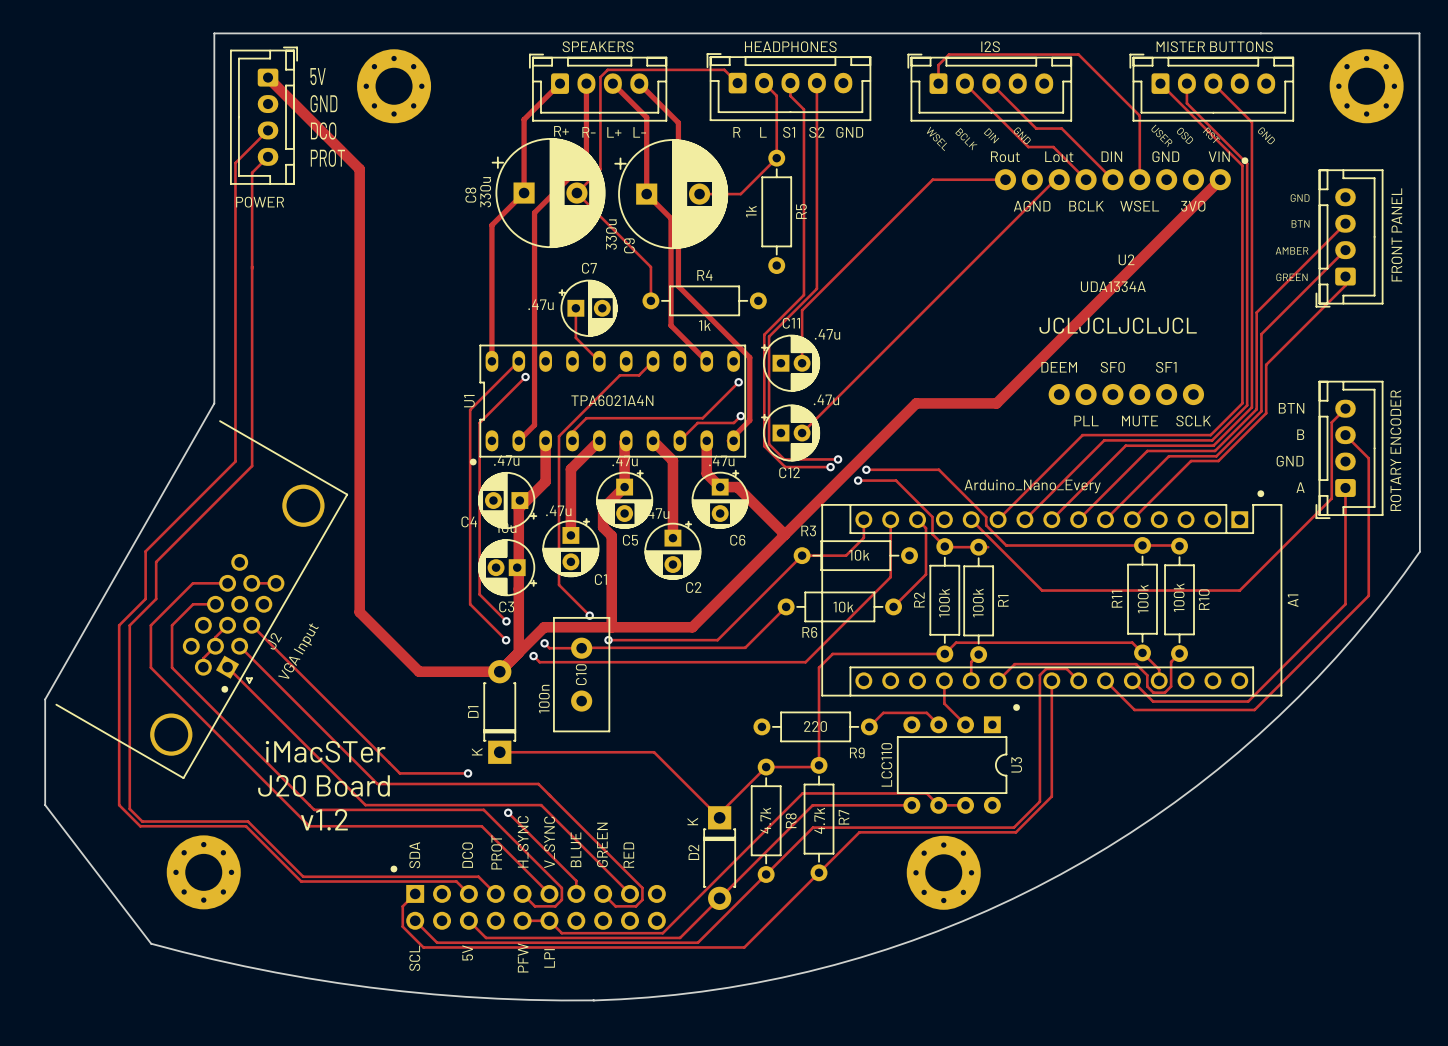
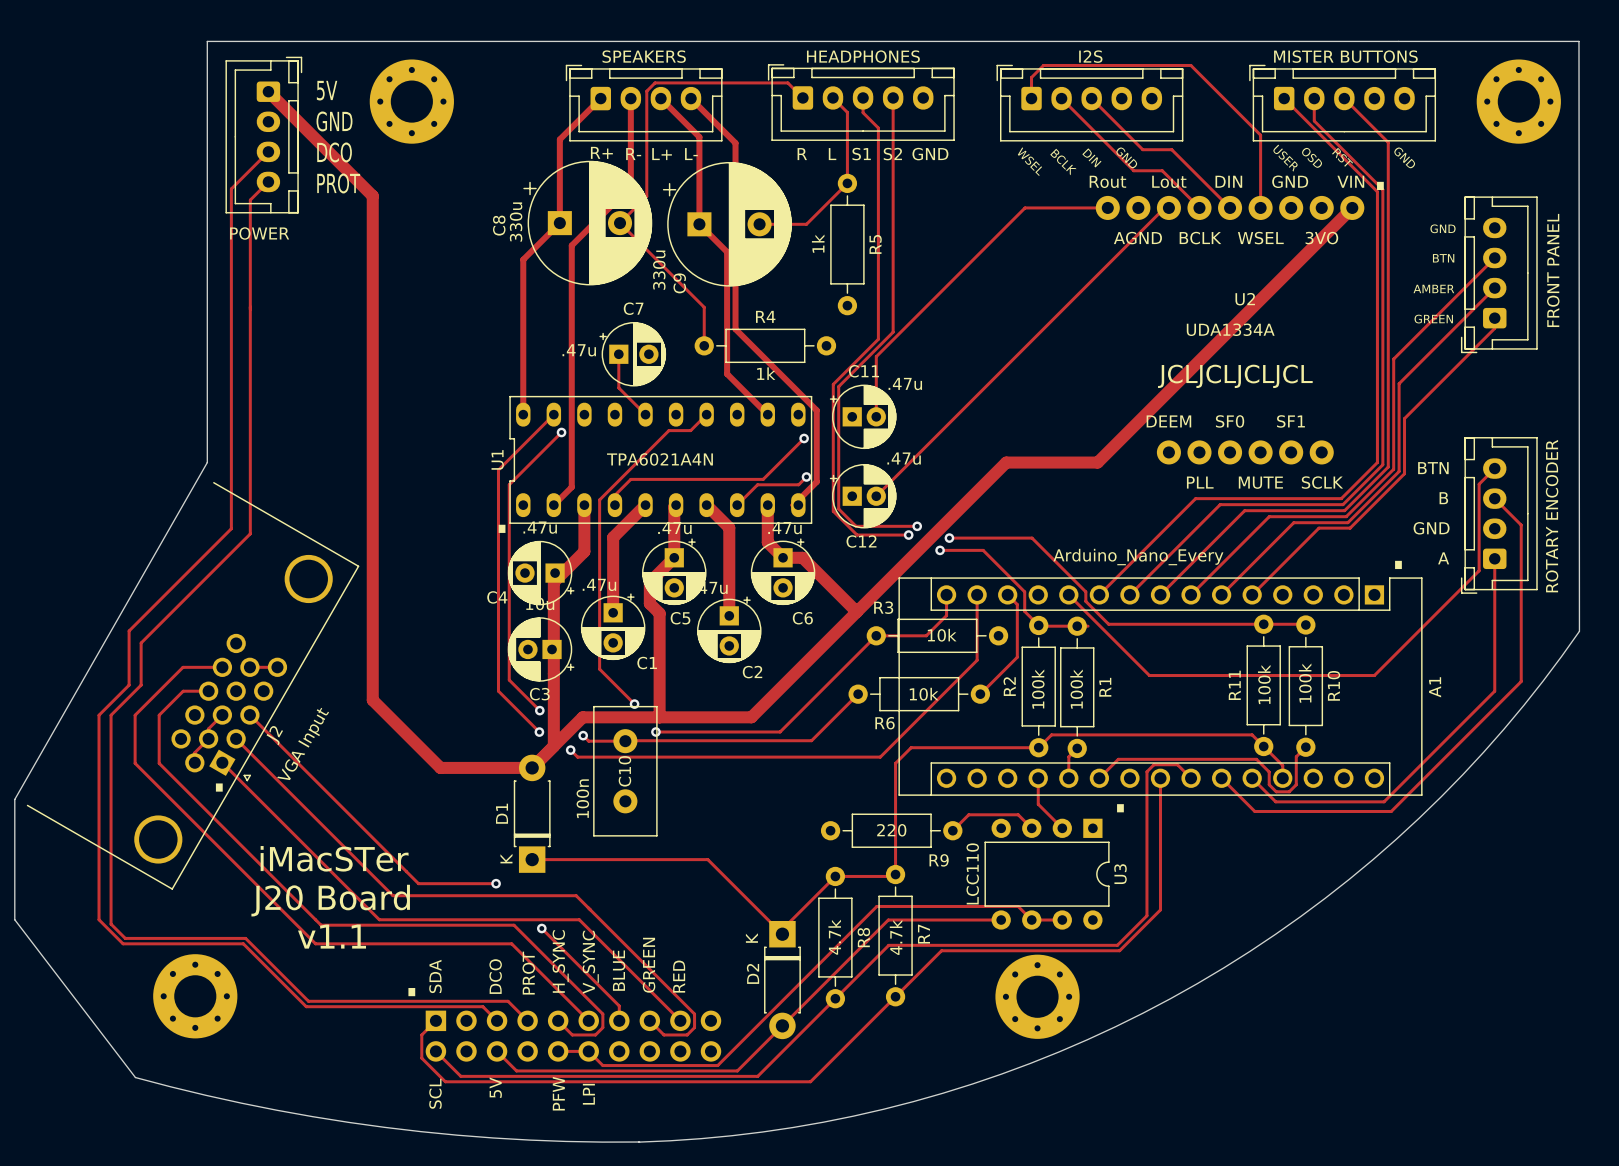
text: v1.2 (324, 819) -> v1.1 (332, 936)

